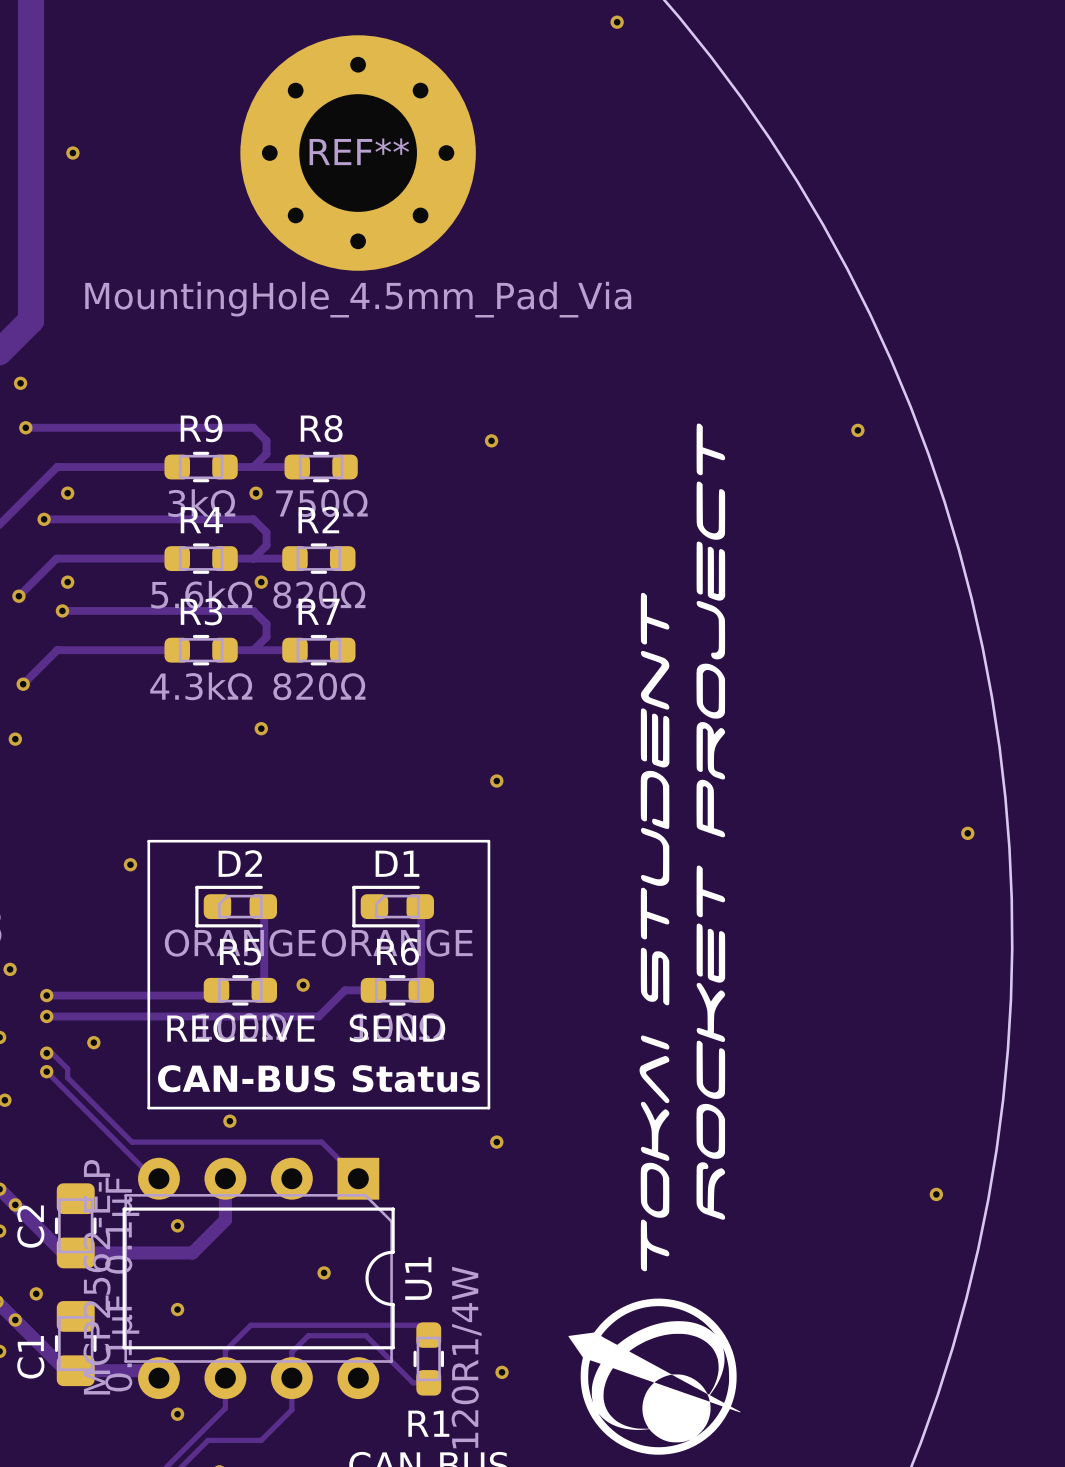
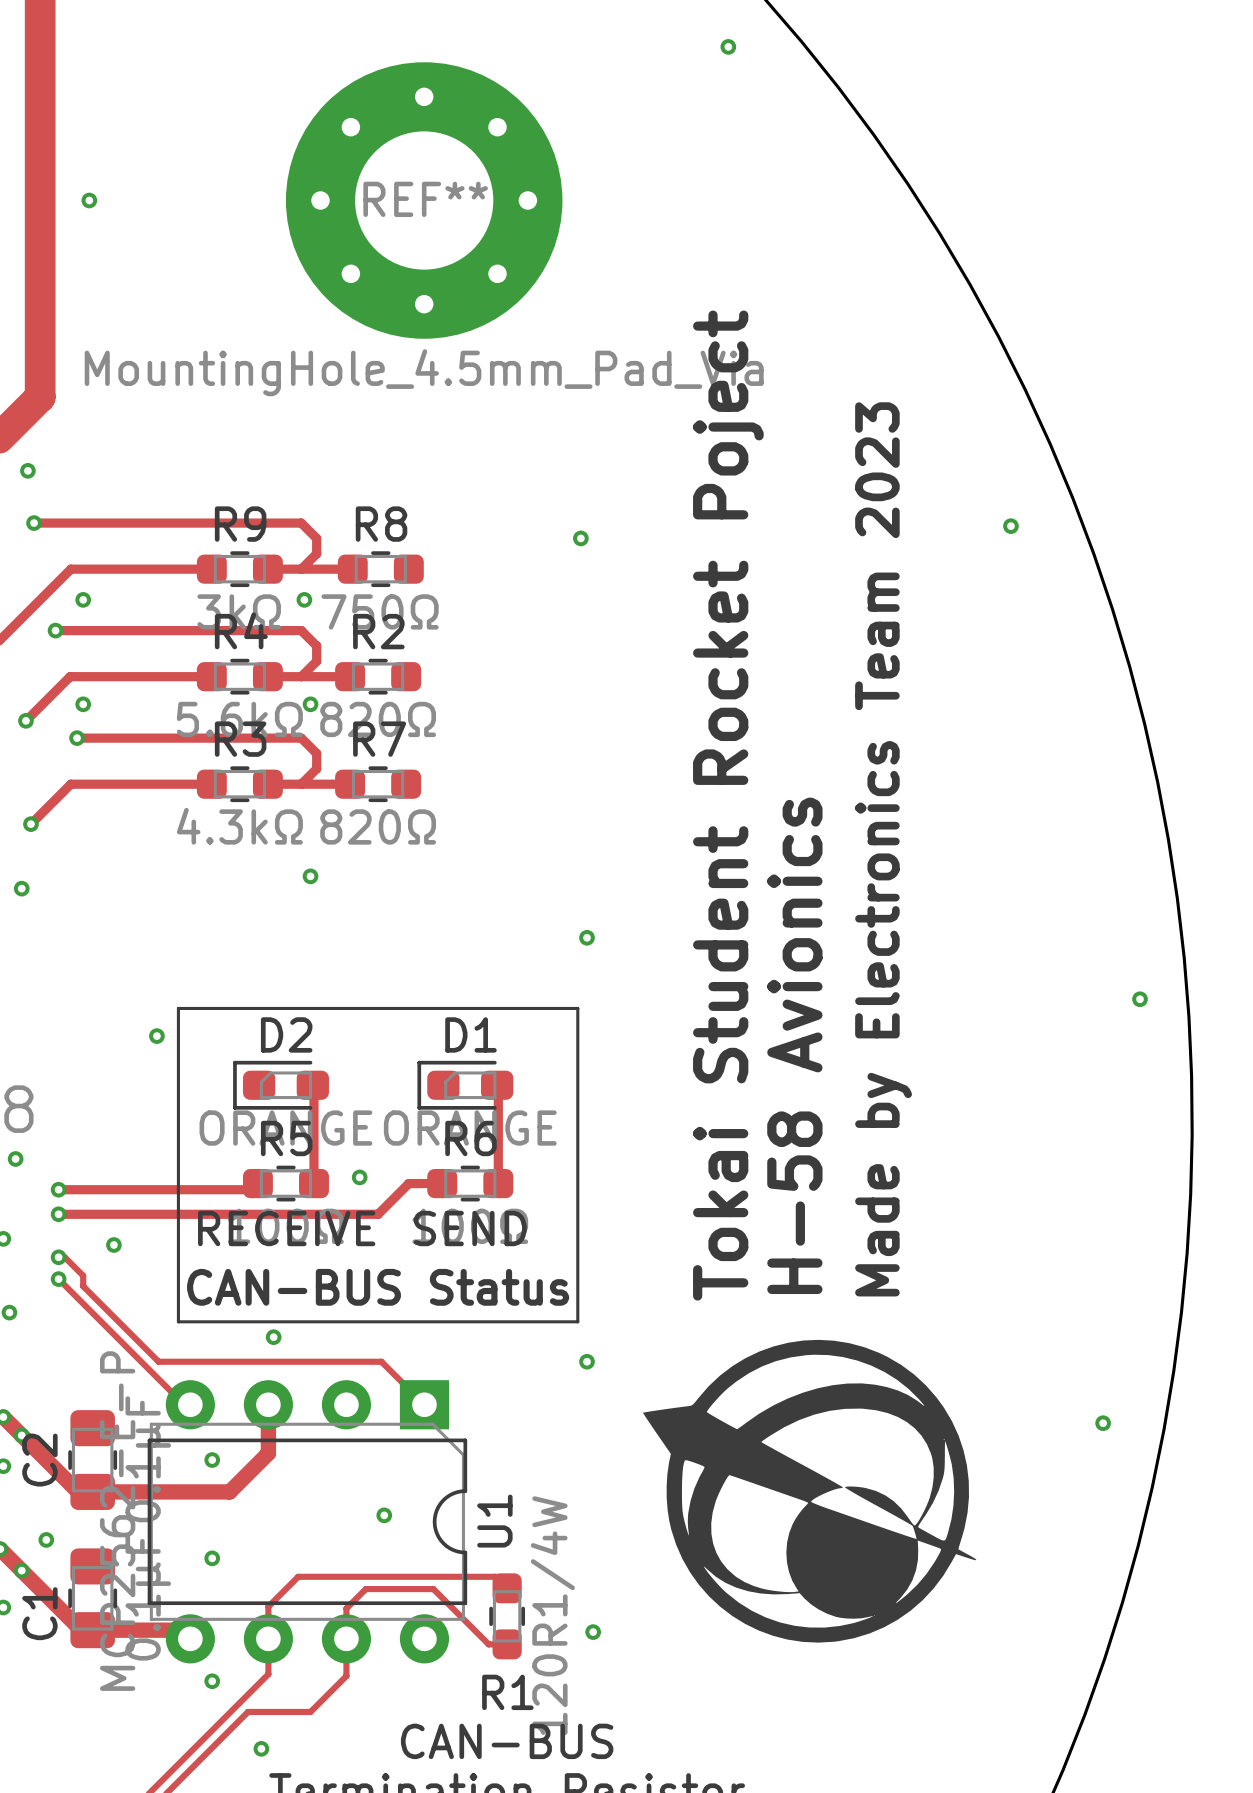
drawing: [568, 423, 741, 1455] -> none
text: none -> Tokai Student Rocket Poject (728, 805)
text: none -> Made by Electronics Team 2023 (883, 849)
text: none -> H-58 Avionics (794, 1045)
drawing: none -> [643, 1339, 977, 1643]

